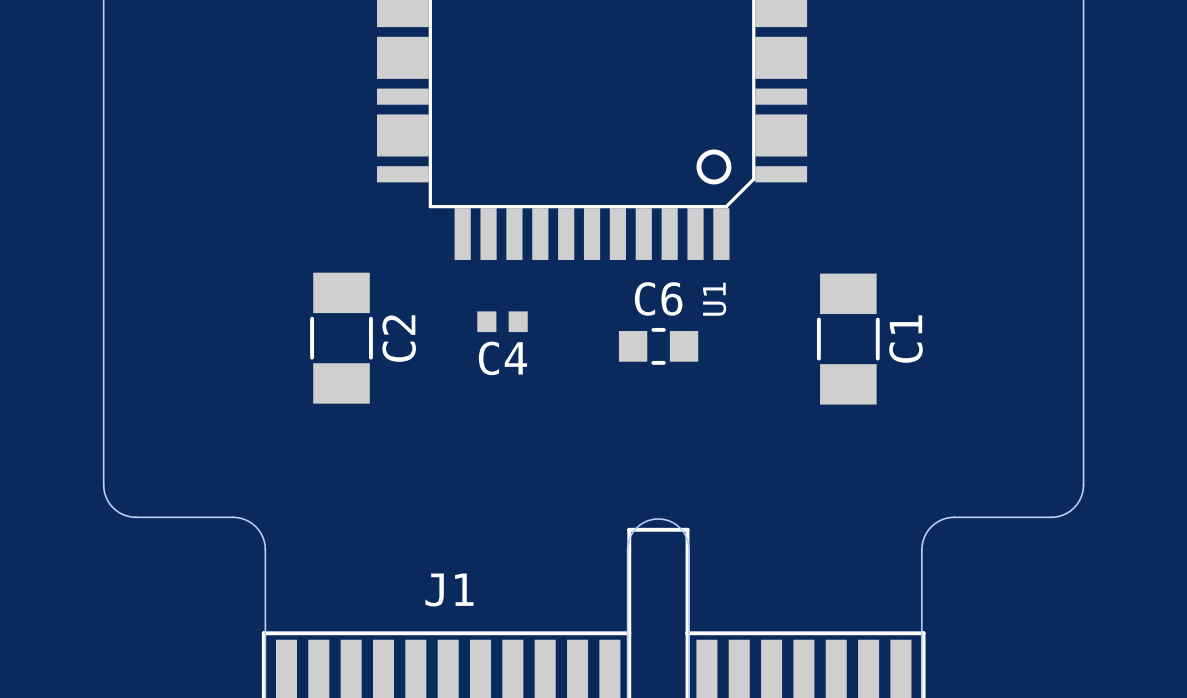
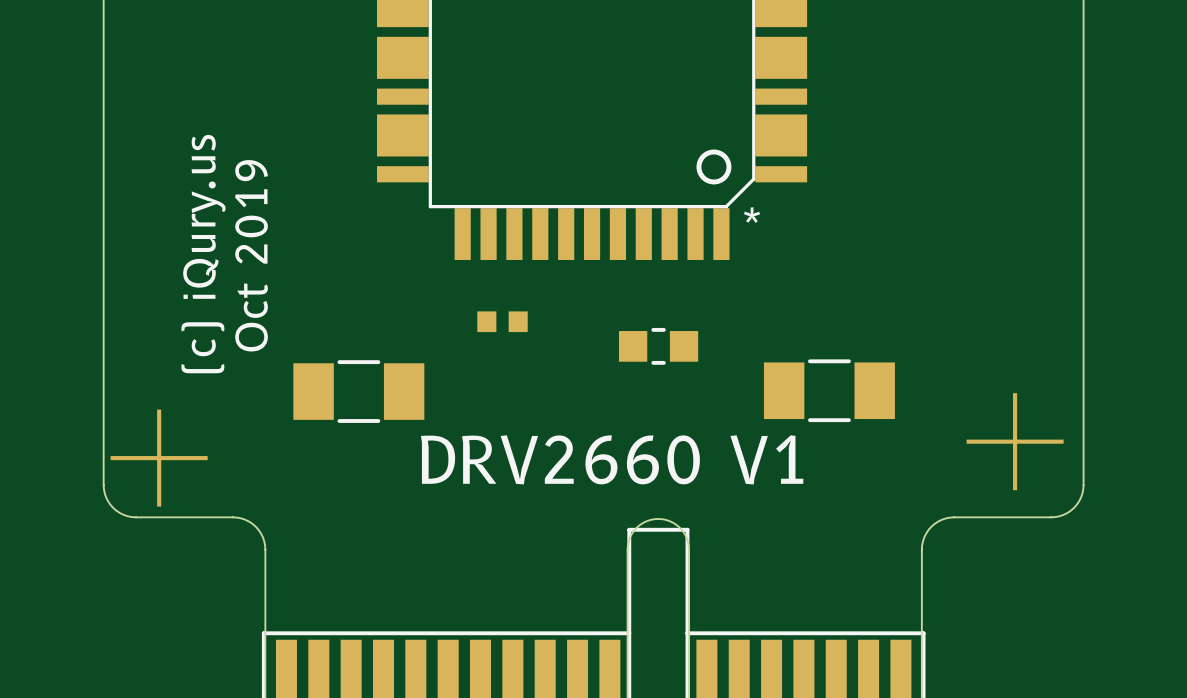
text: none -> * (752, 215)
text: none -> (c) iQury.us (203, 254)
text: none -> Oct 2019 (251, 255)
C6 name: C6 (658, 298) -> none
U1 name: U1 (714, 299) -> none
C2: (341, 338) -> none
C1: (848, 339) -> none
C4 name: C4 (502, 358) -> none
part: none -> (829, 390)
part: none -> (358, 391)
part: none -> (1015, 441)
part: none -> (159, 458)
text: none -> DRV2660 V1 (612, 459)
J1 name: J1 (449, 590) -> none

